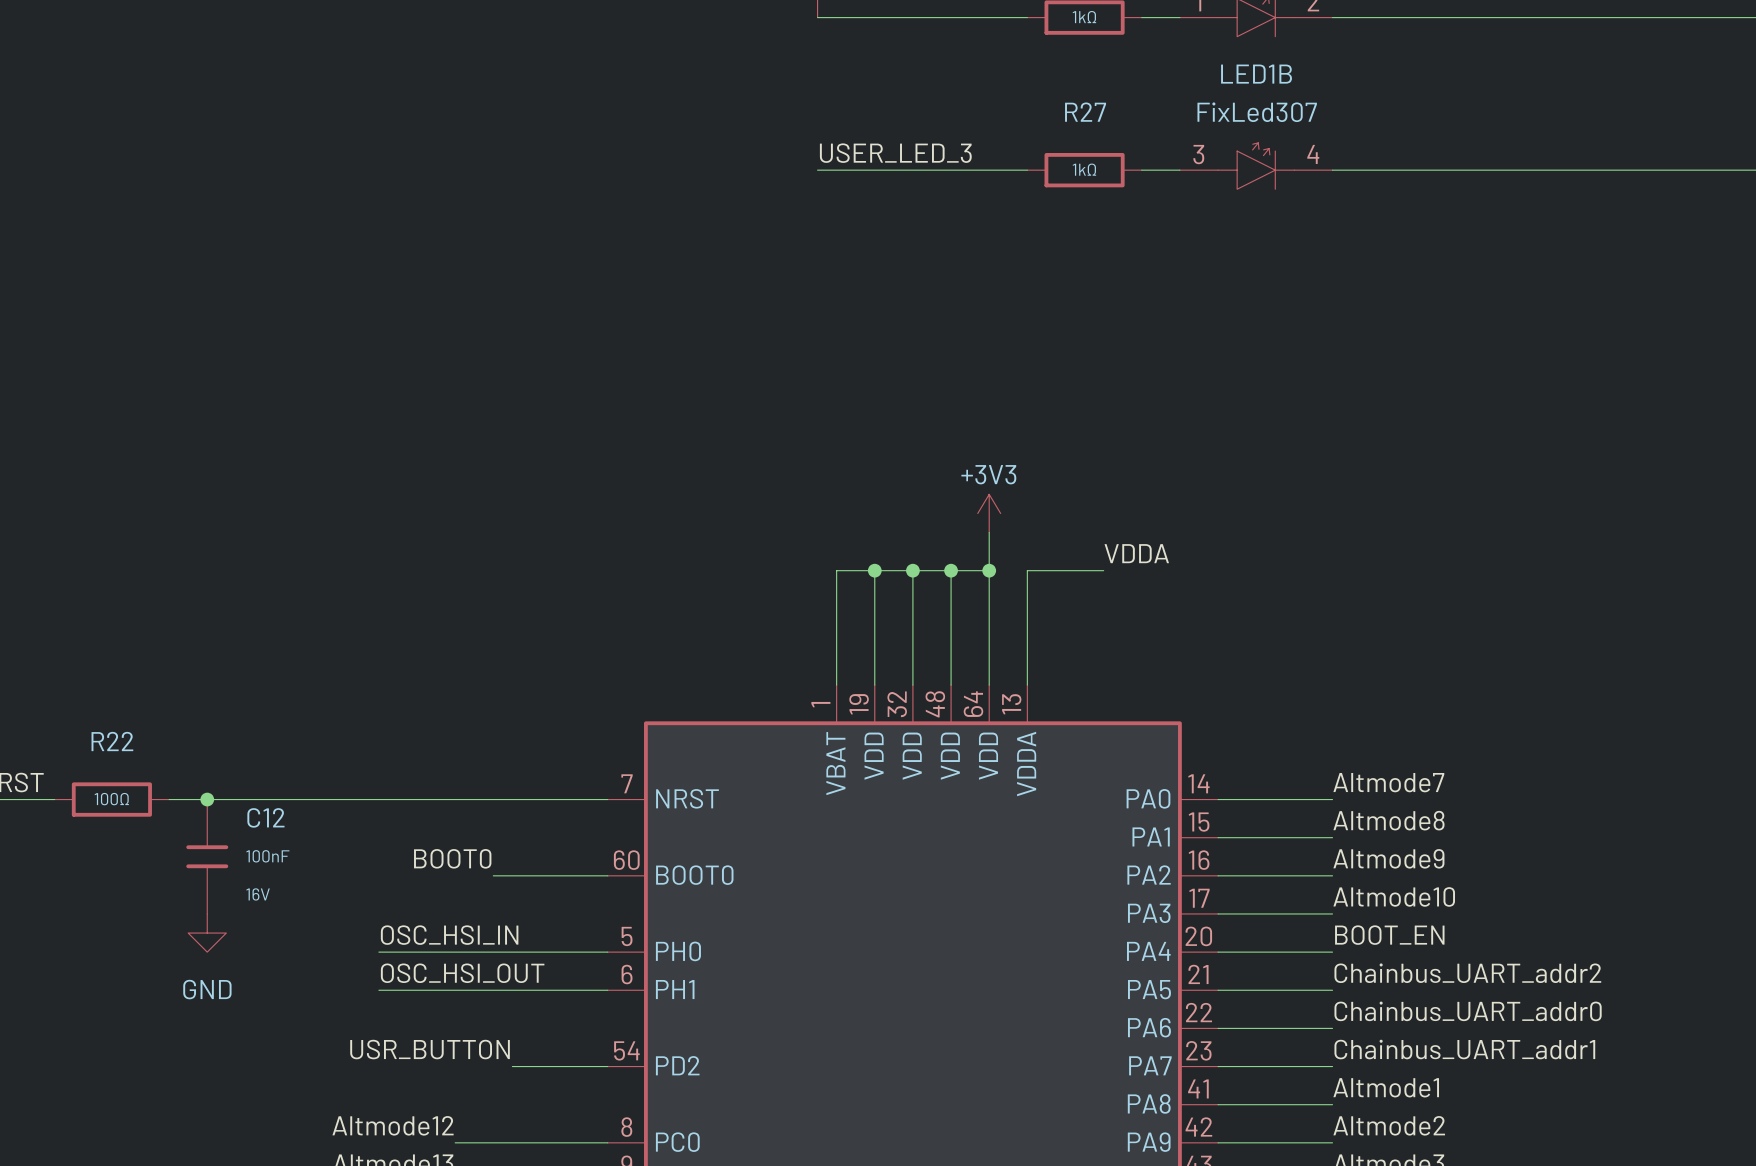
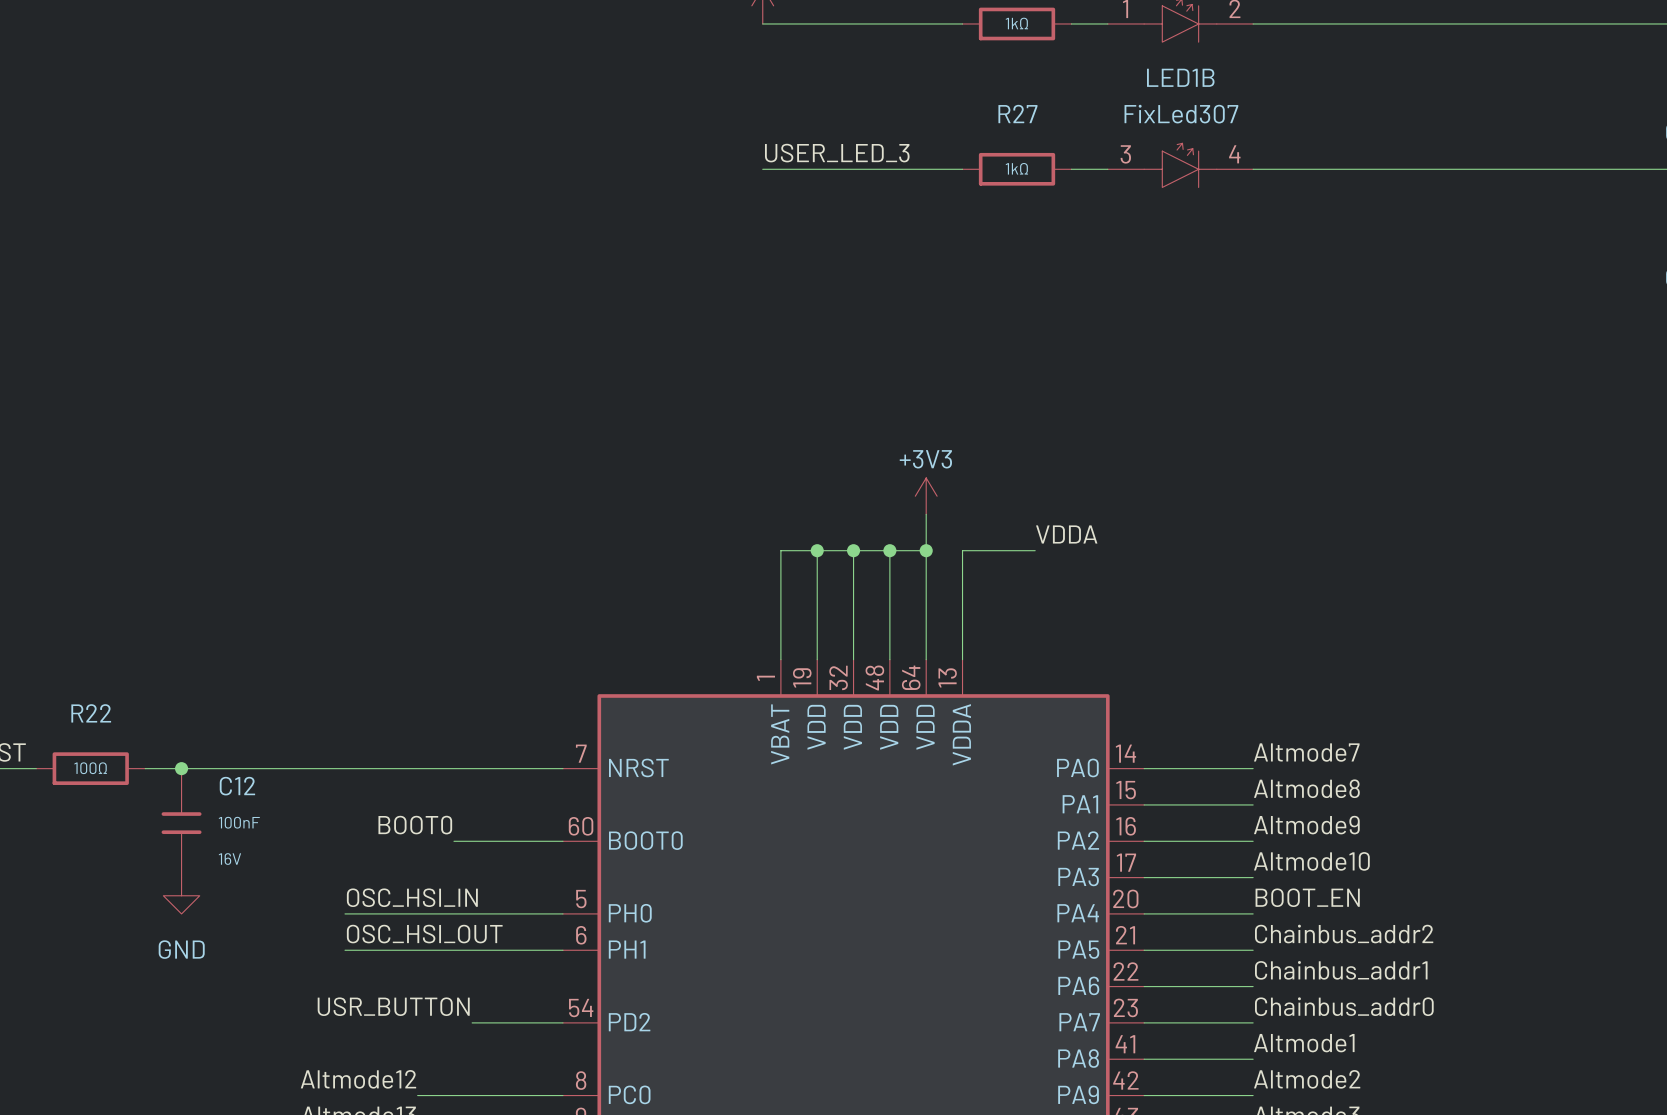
label: Chainbus_UART_addr2 (1467, 973) -> Chainbus_addr2 (1344, 934)
label: Chainbus_UART_addr0 (1468, 1011) -> Chainbus_addr1 (1341, 970)
label: Chainbus_UART_addr1 (1464, 1049) -> Chainbus_addr0 (1344, 1006)

